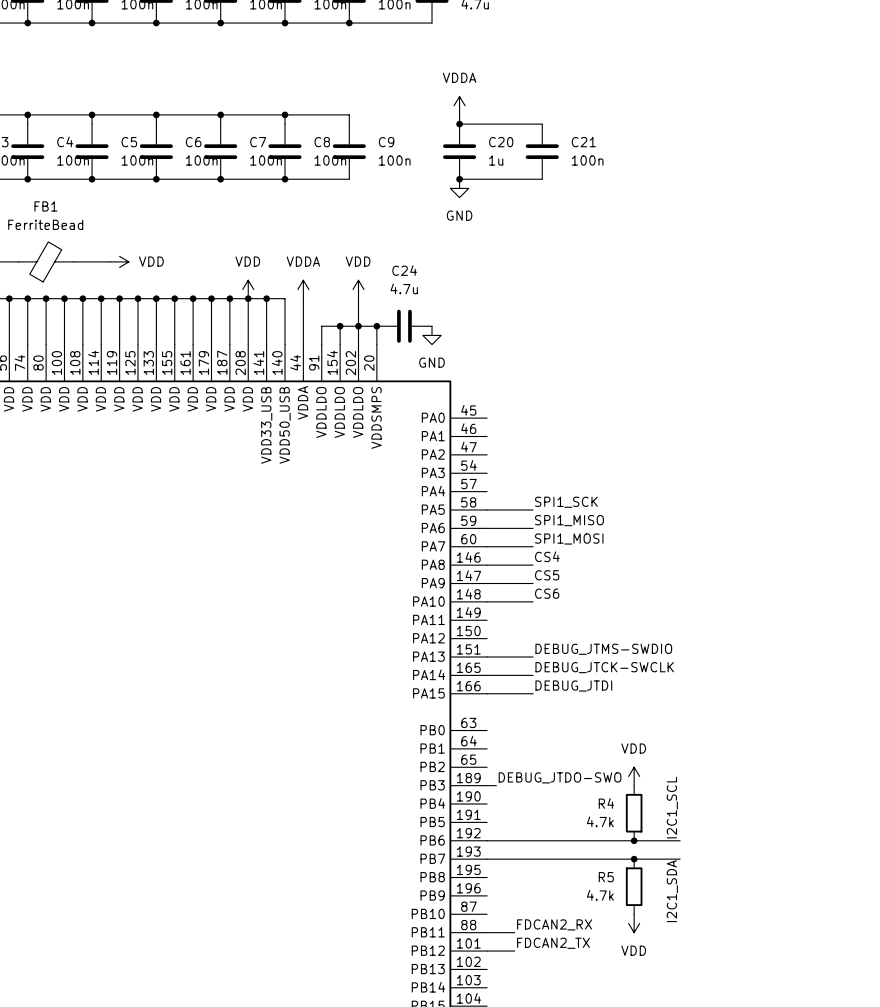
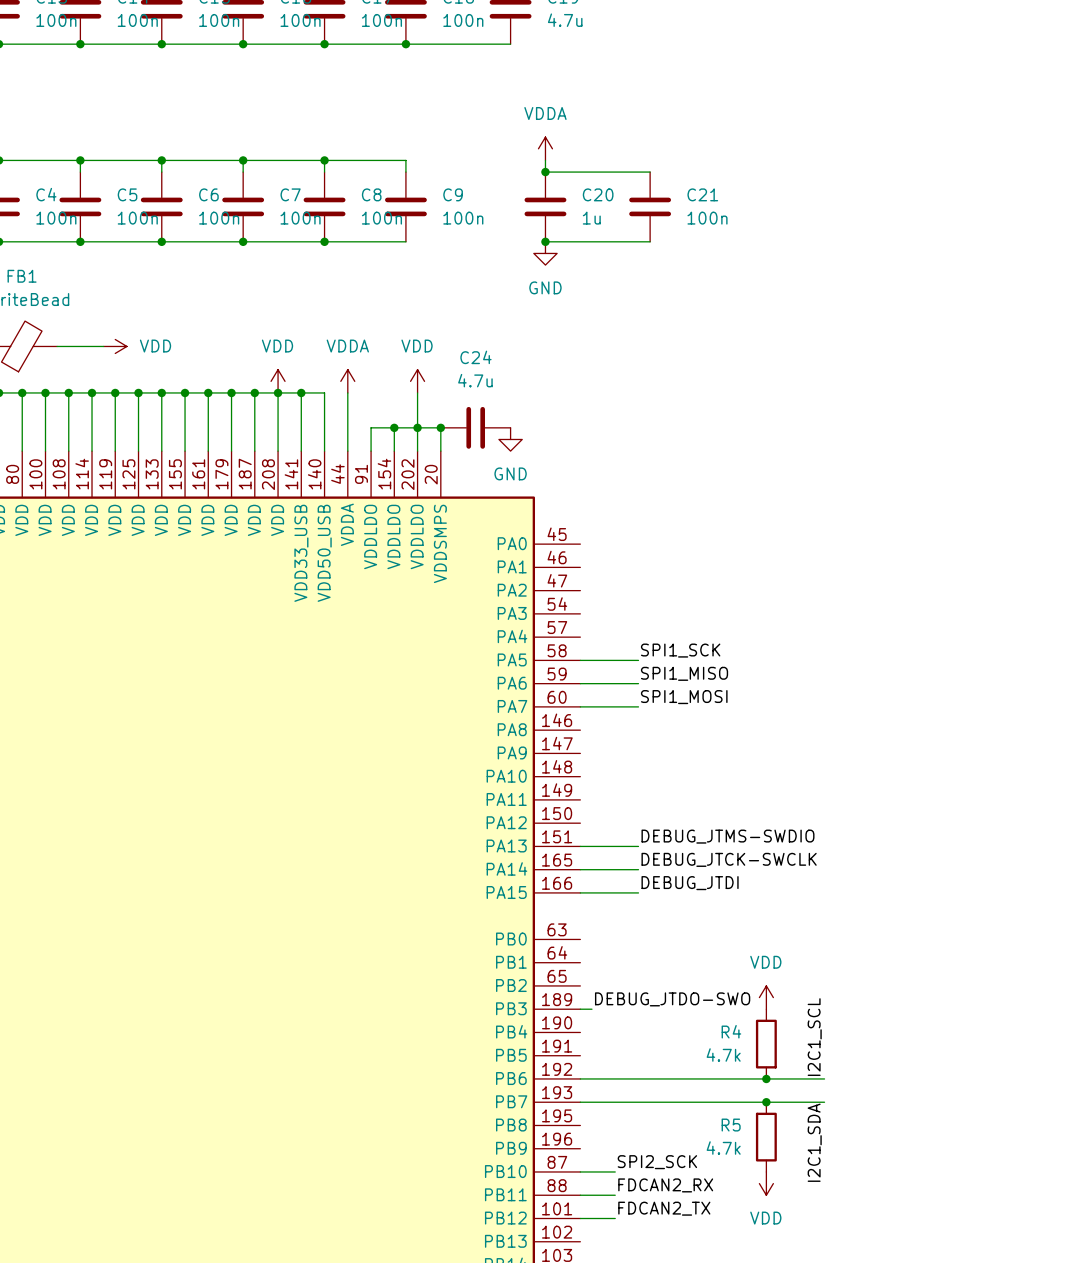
label: CS4 (547, 556) -> none
wire: (487, 565) (533, 565) -> none
label: CS5 (547, 575) -> none
wire: (487, 583) (533, 583) -> none
label: CS6 (547, 593) -> none
wire: (487, 601) (533, 601) -> none
label: none -> SPI2_SCK (657, 1162)
wire: none -> (580, 1171) (615, 1171)

